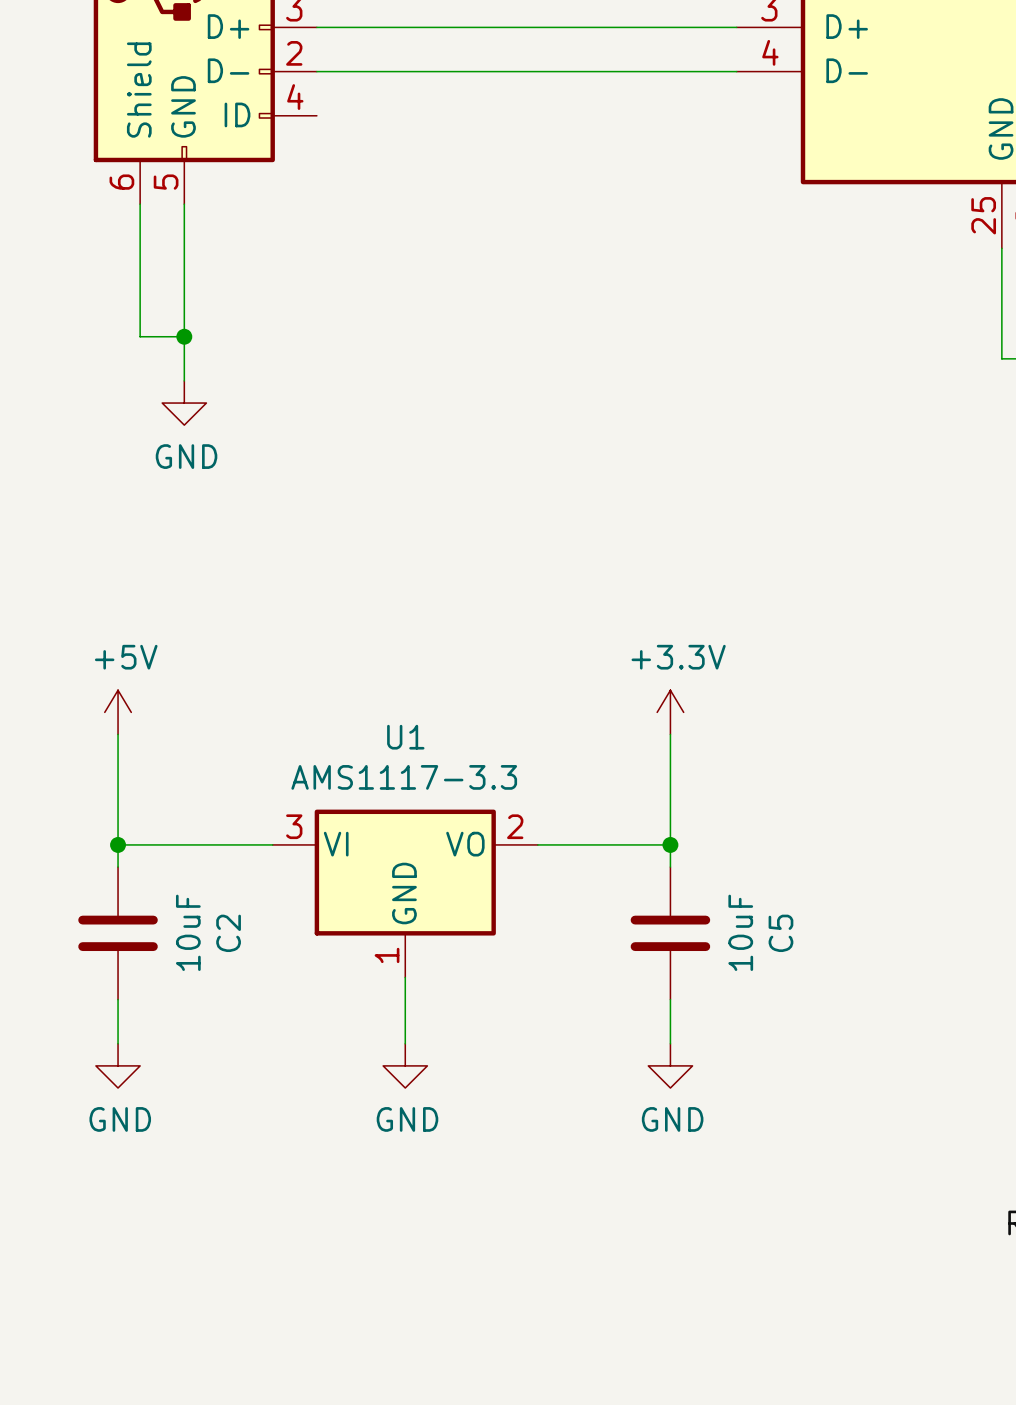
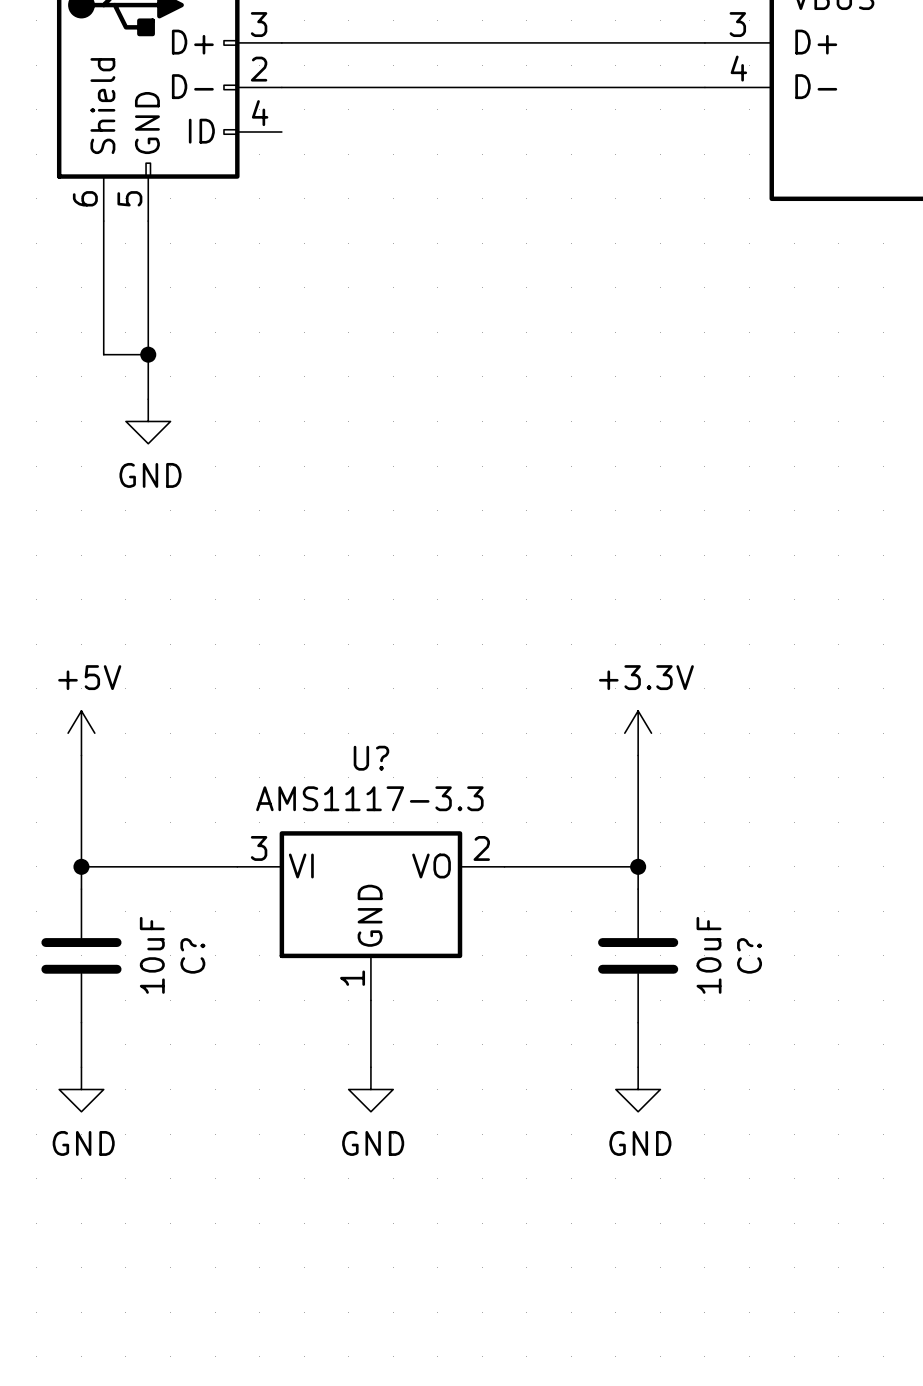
U1 name: U1 (405, 737) -> U? (371, 758)
C2 name: C2 (228, 933) -> C? (192, 955)
C5 name: C5 (780, 933) -> C? (749, 955)

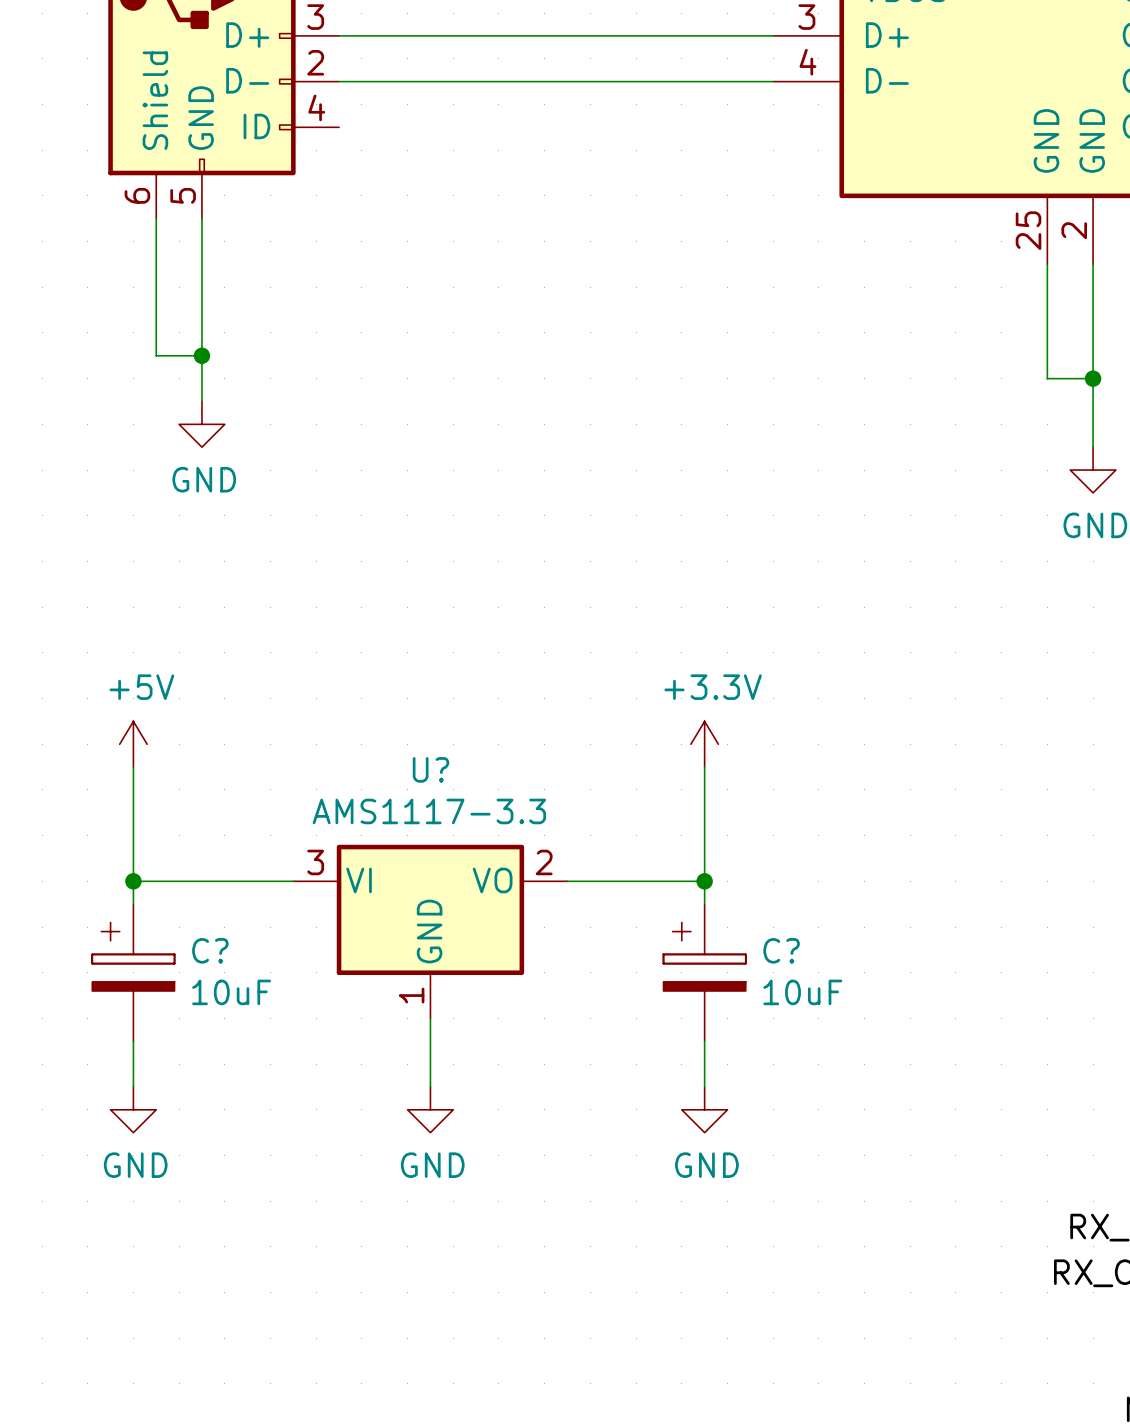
C? symbol: [41, 889, 122, 1023] -> [92, 904, 175, 1042]
C? symbol: [598, 889, 679, 1023] -> [663, 904, 746, 1042]
C? name position: C? (192, 955) -> C? (210, 950)
C? name position: C? (749, 955) -> C? (781, 950)

